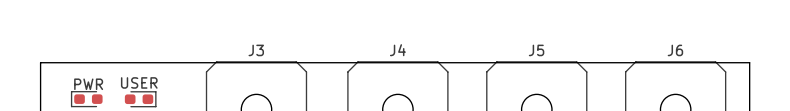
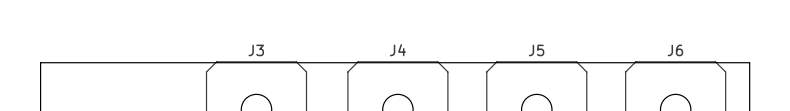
PWR: (86, 99) -> none
USER: (140, 99) -> none

